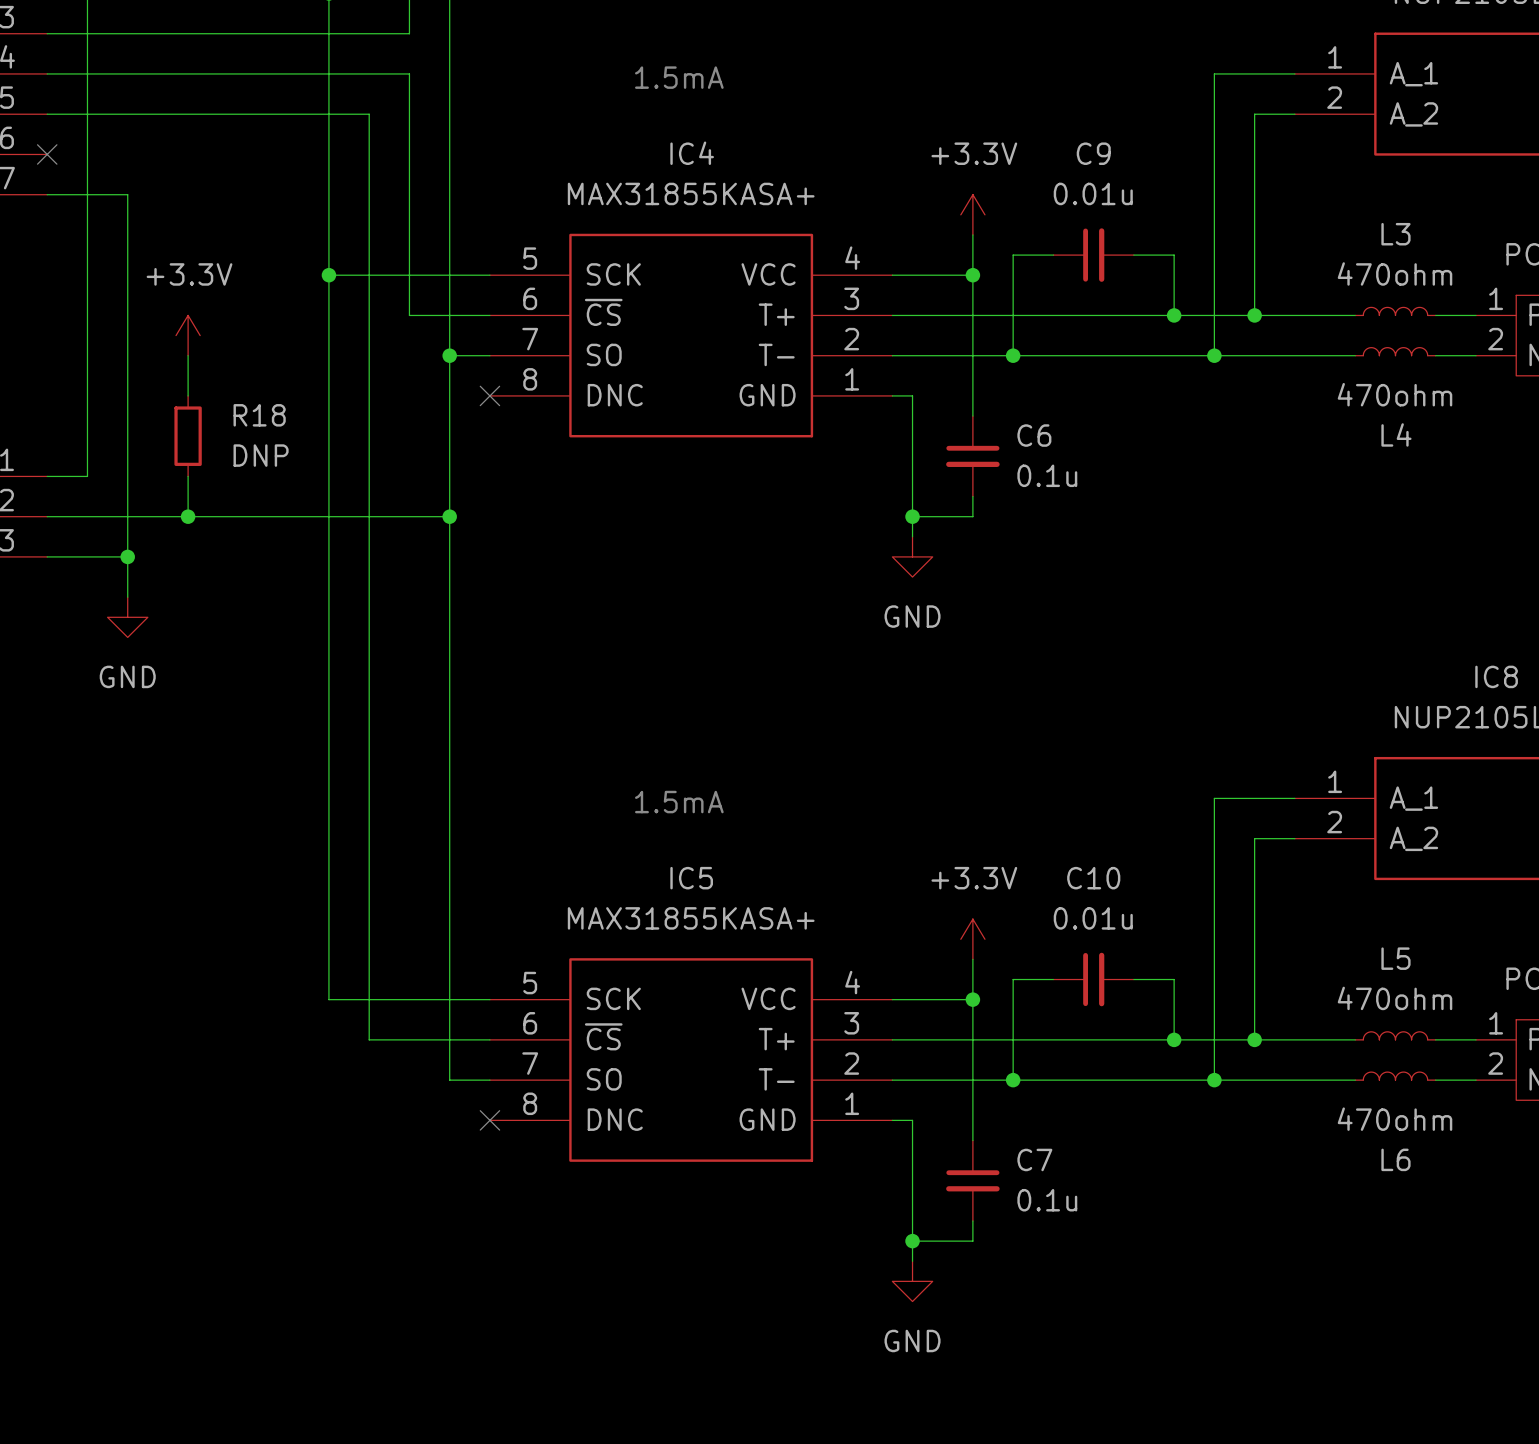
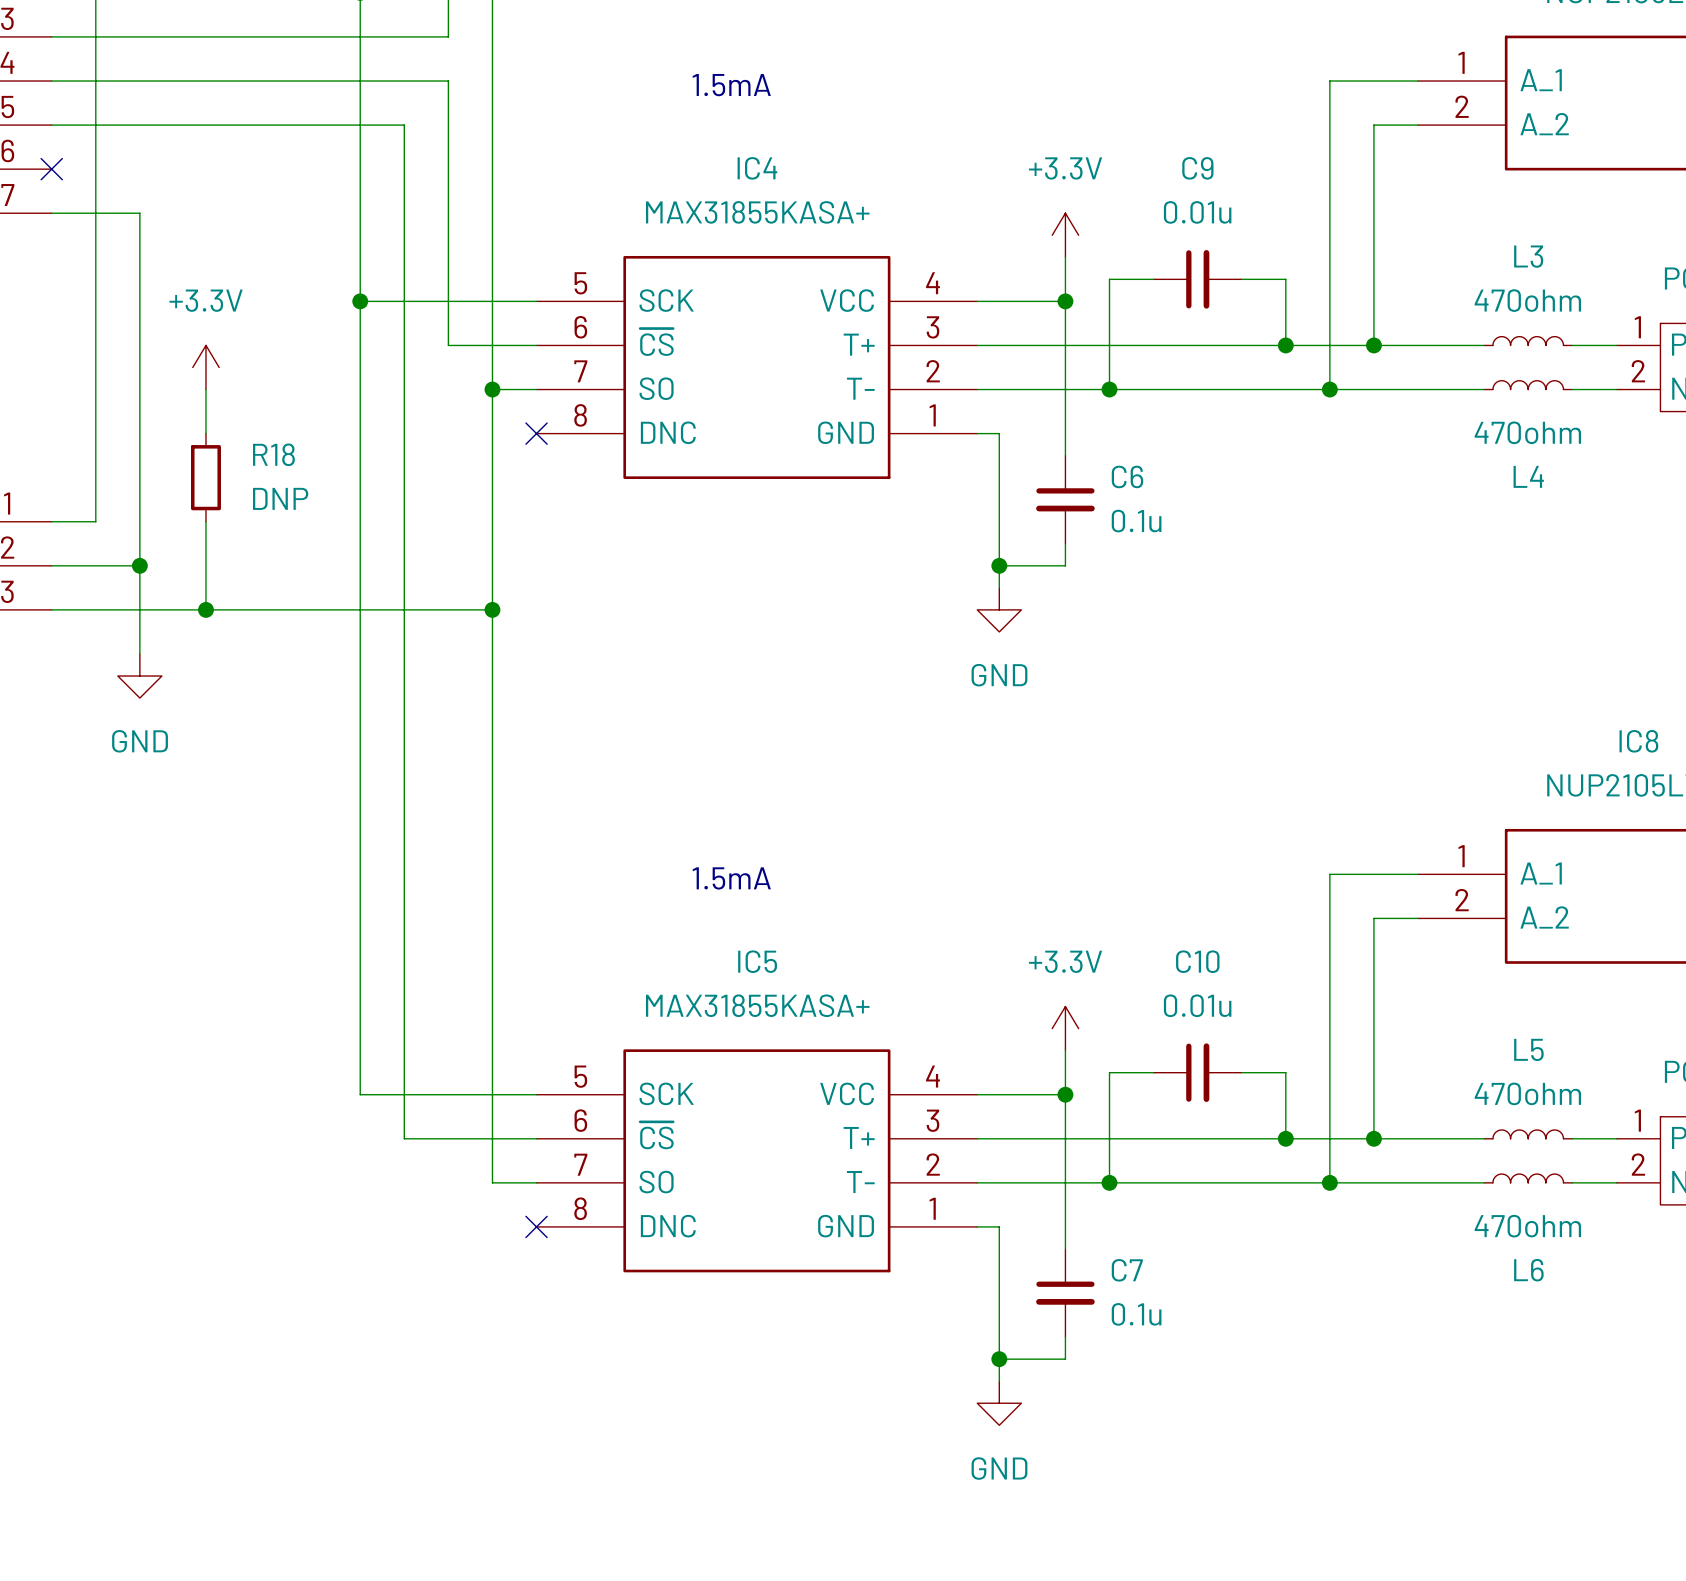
wire: (127, 516) (449, 516) -> (139, 609) (492, 609)
junction: none -> (139, 565)
wire: none -> (205, 565) (205, 609)
junction: (188, 516) -> none
junction position: (449, 516) -> (492, 609)
junction: (127, 556) -> none
junction: none -> (205, 609)

